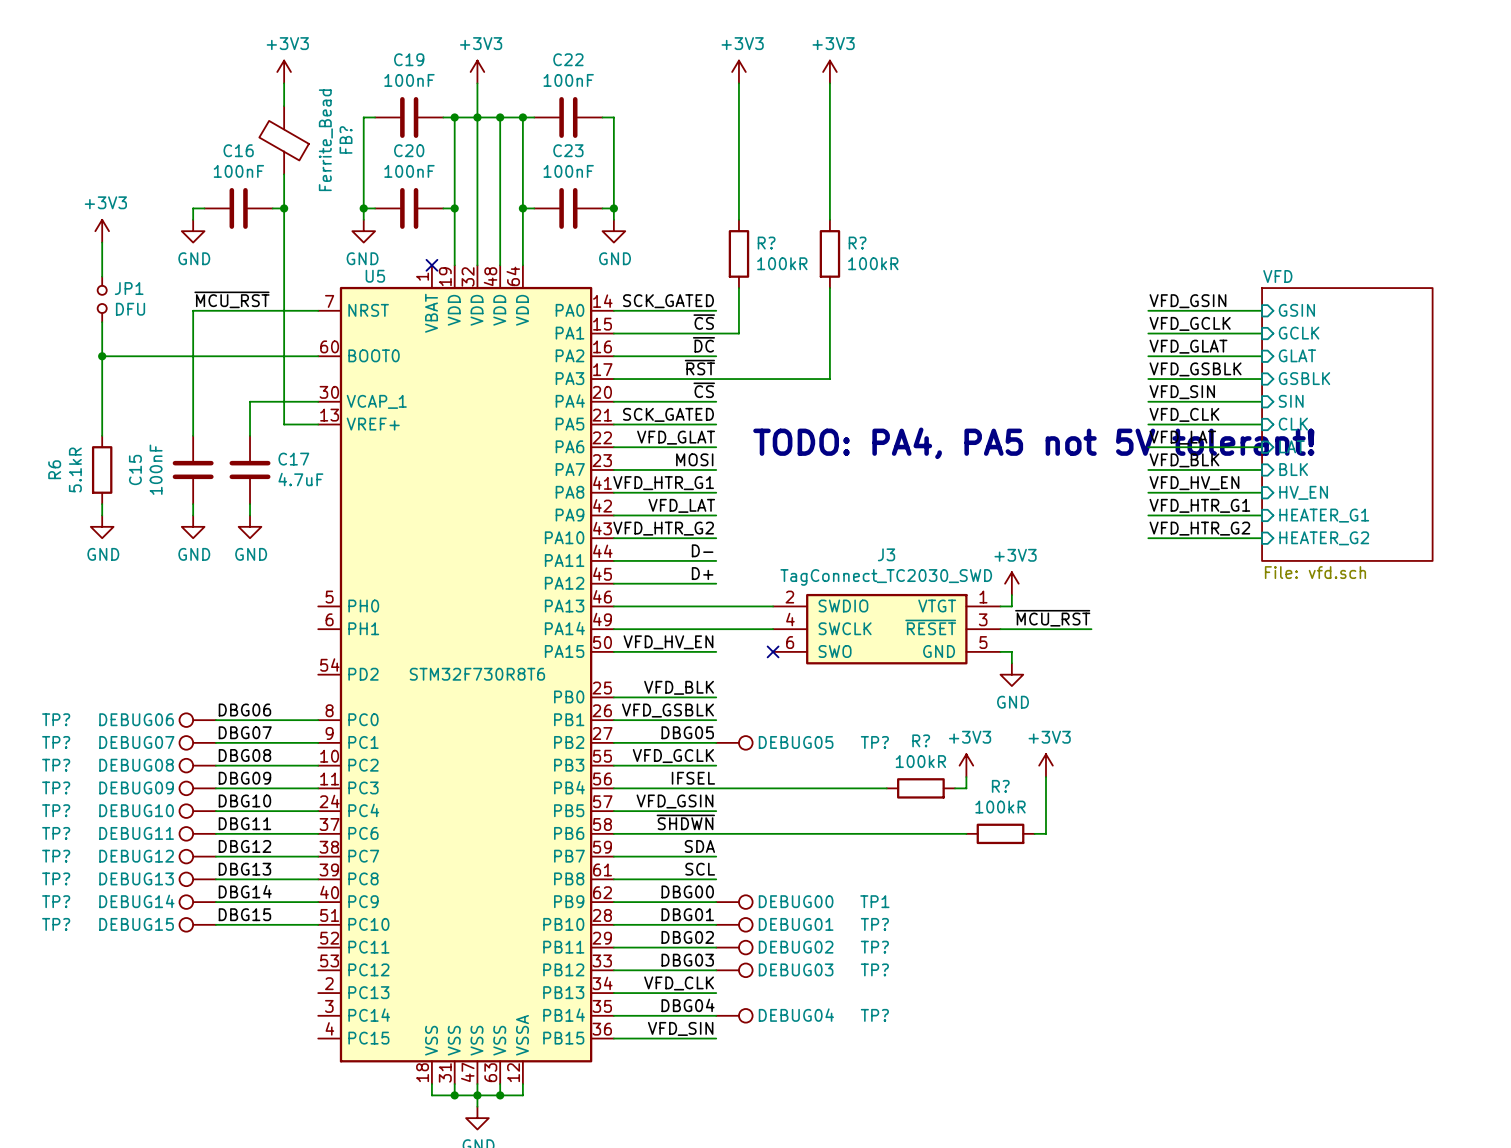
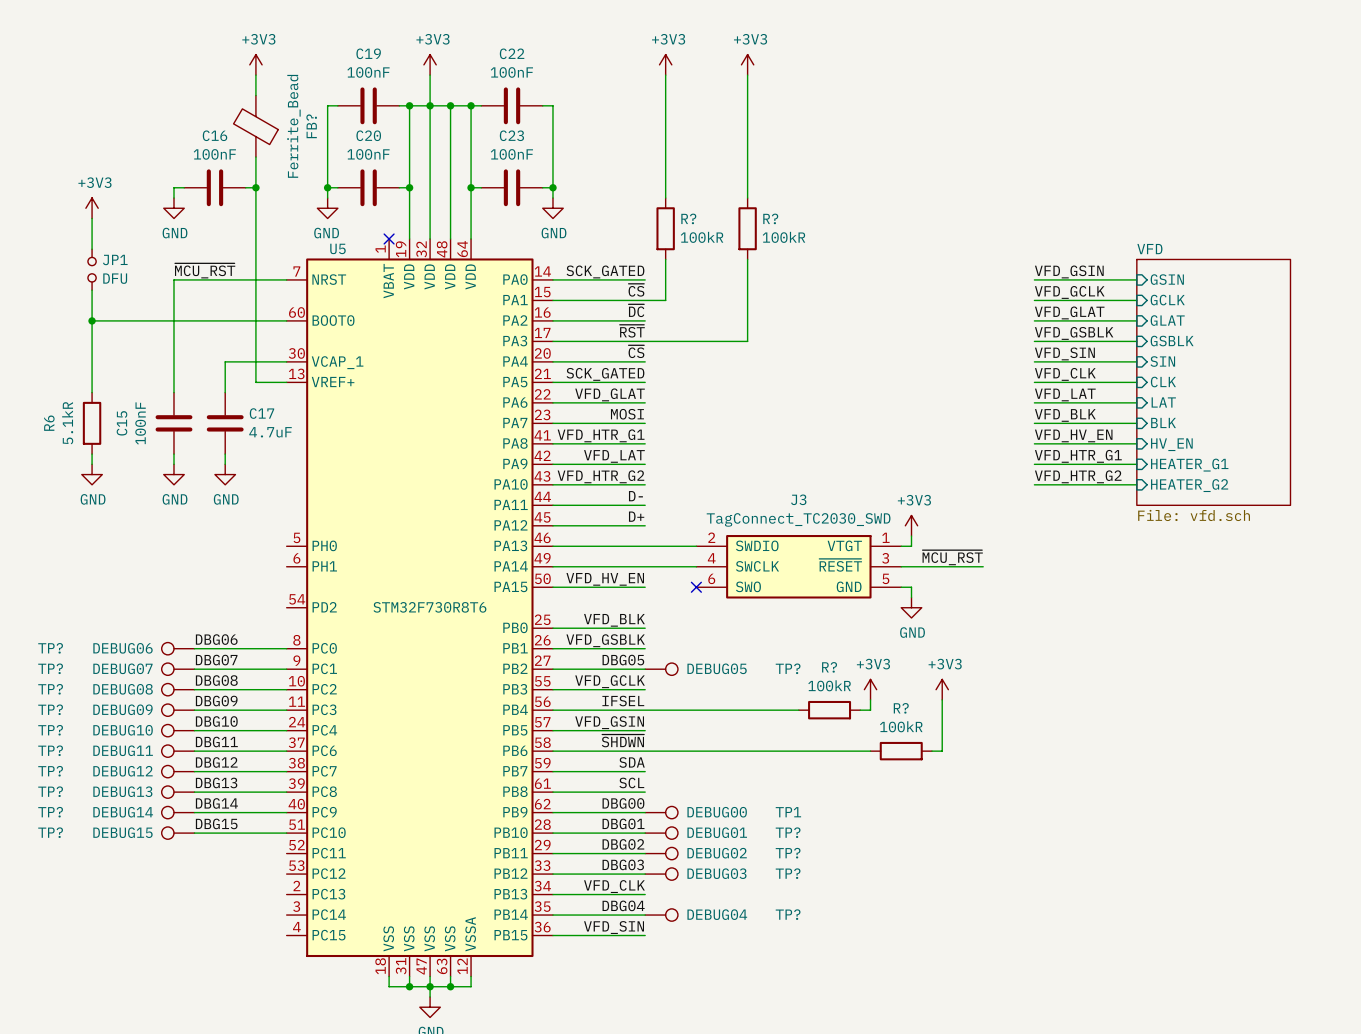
text: TODO: PA4, PA5 not 5V tolerant! (1033, 443) -> none

